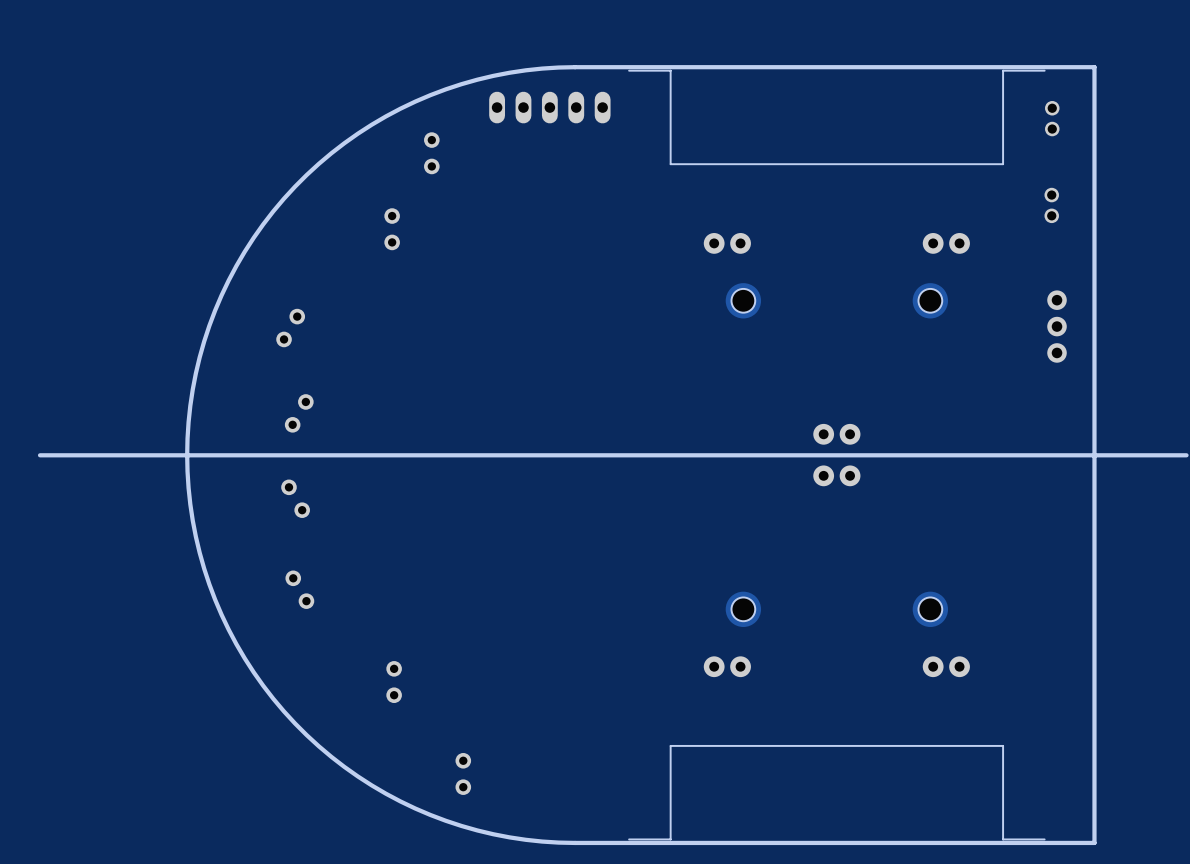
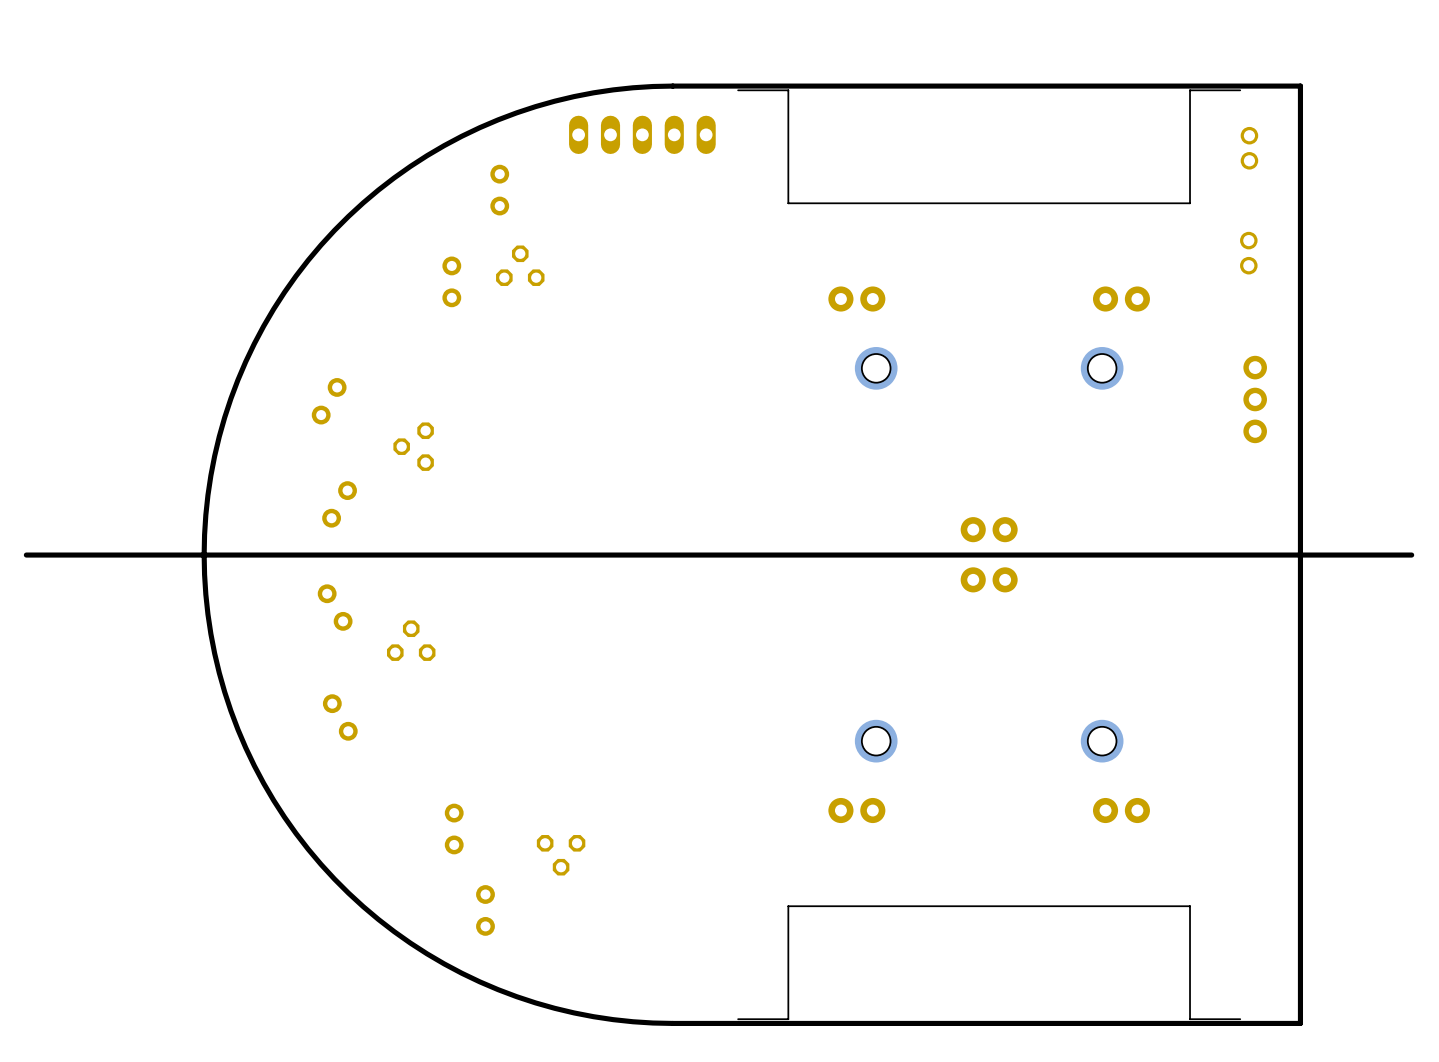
part: none -> (520, 265)
part: none -> (413, 446)
part: none -> (411, 640)
part: none -> (561, 855)
part position: (463, 773) -> (485, 910)

